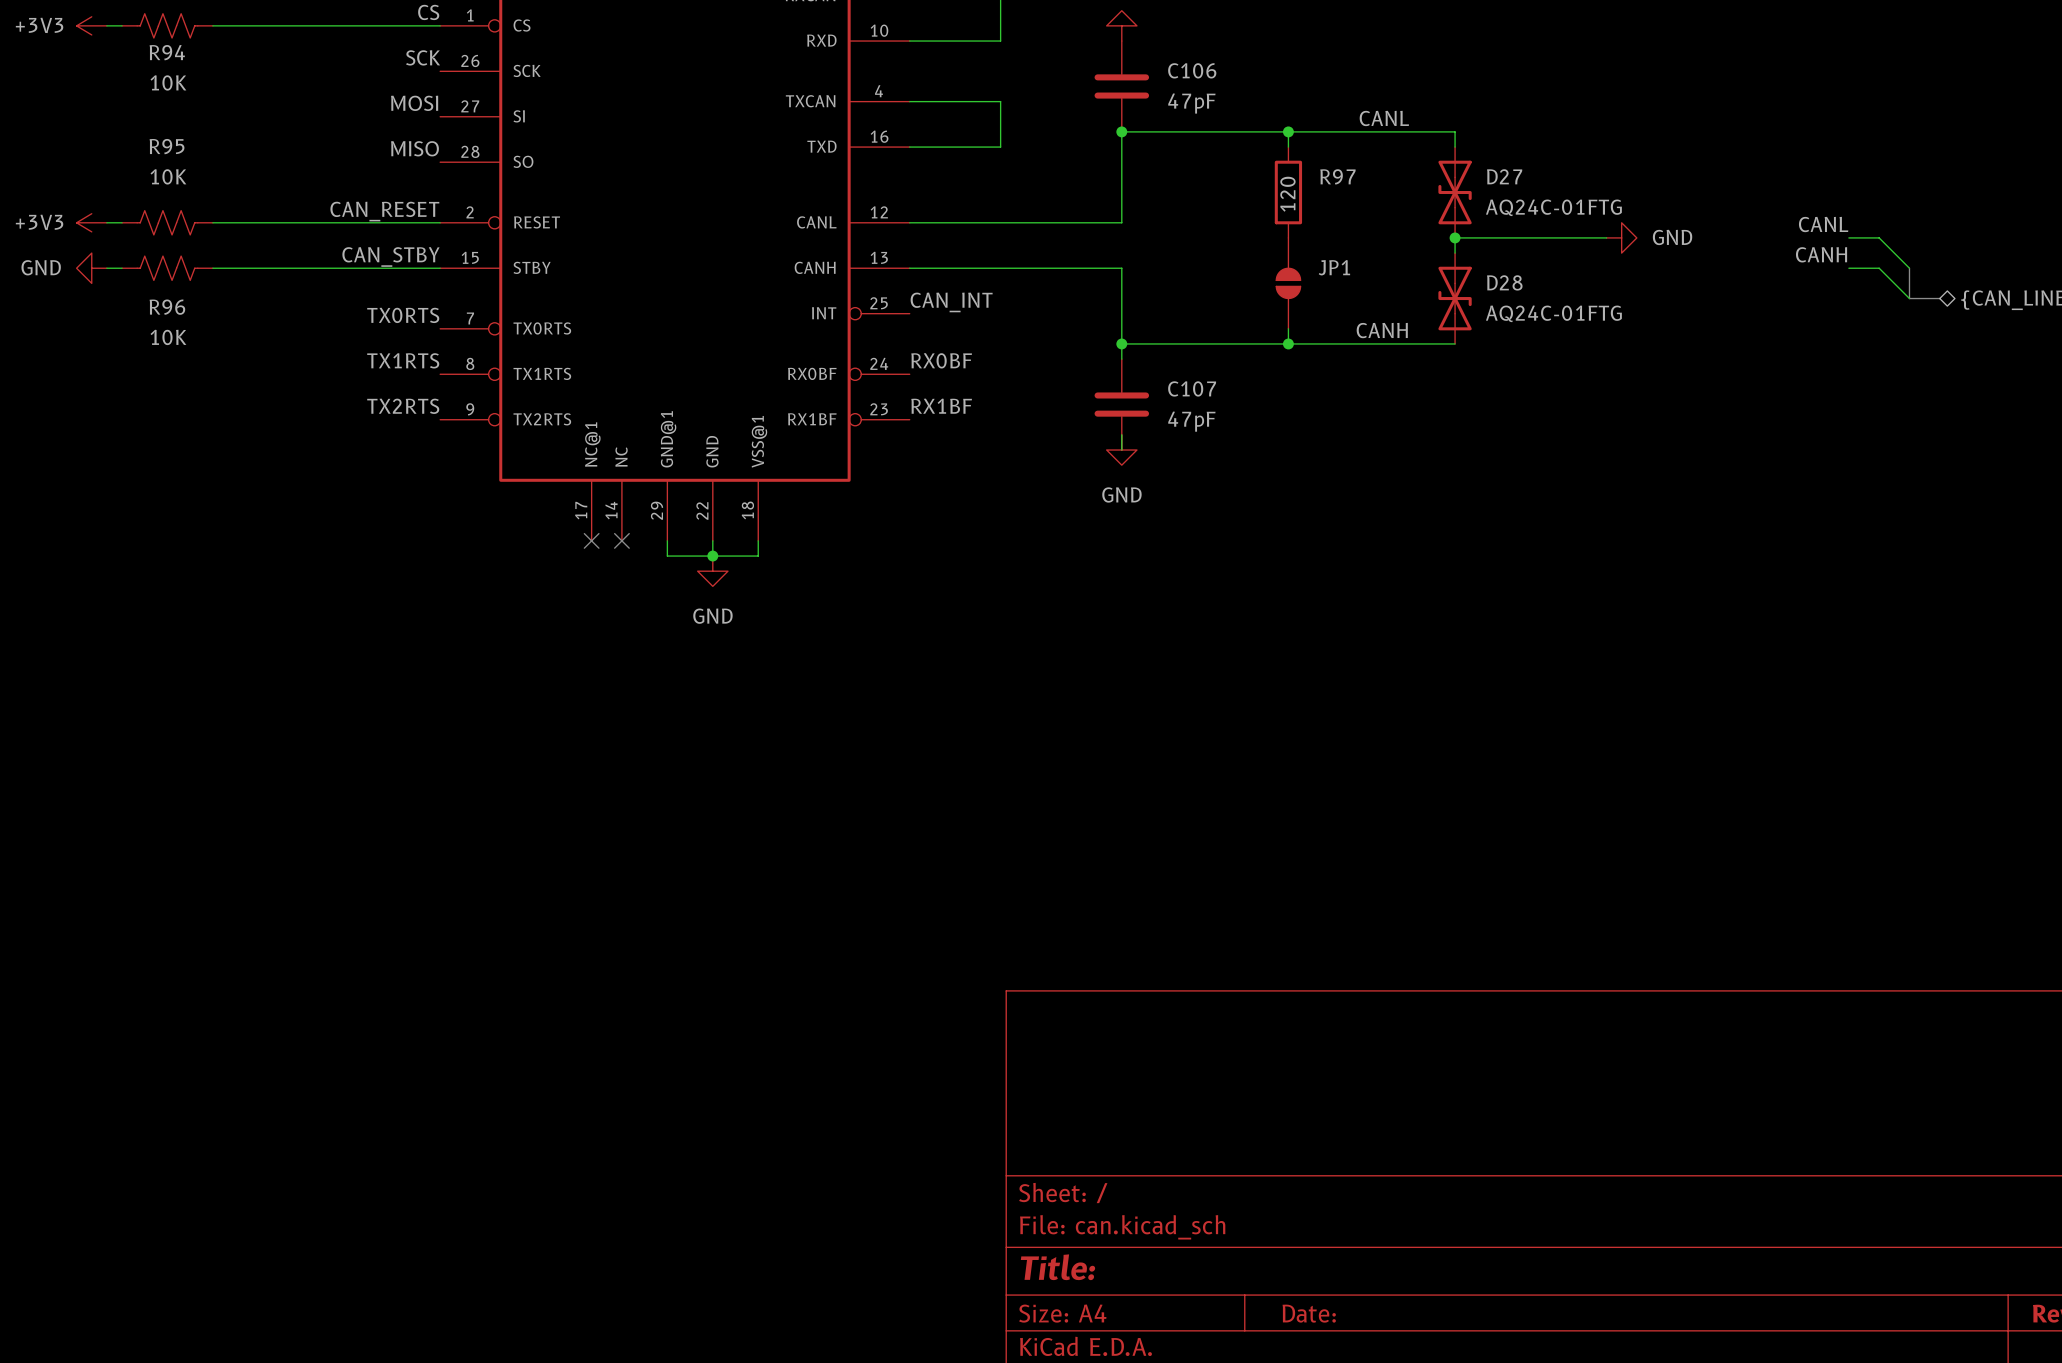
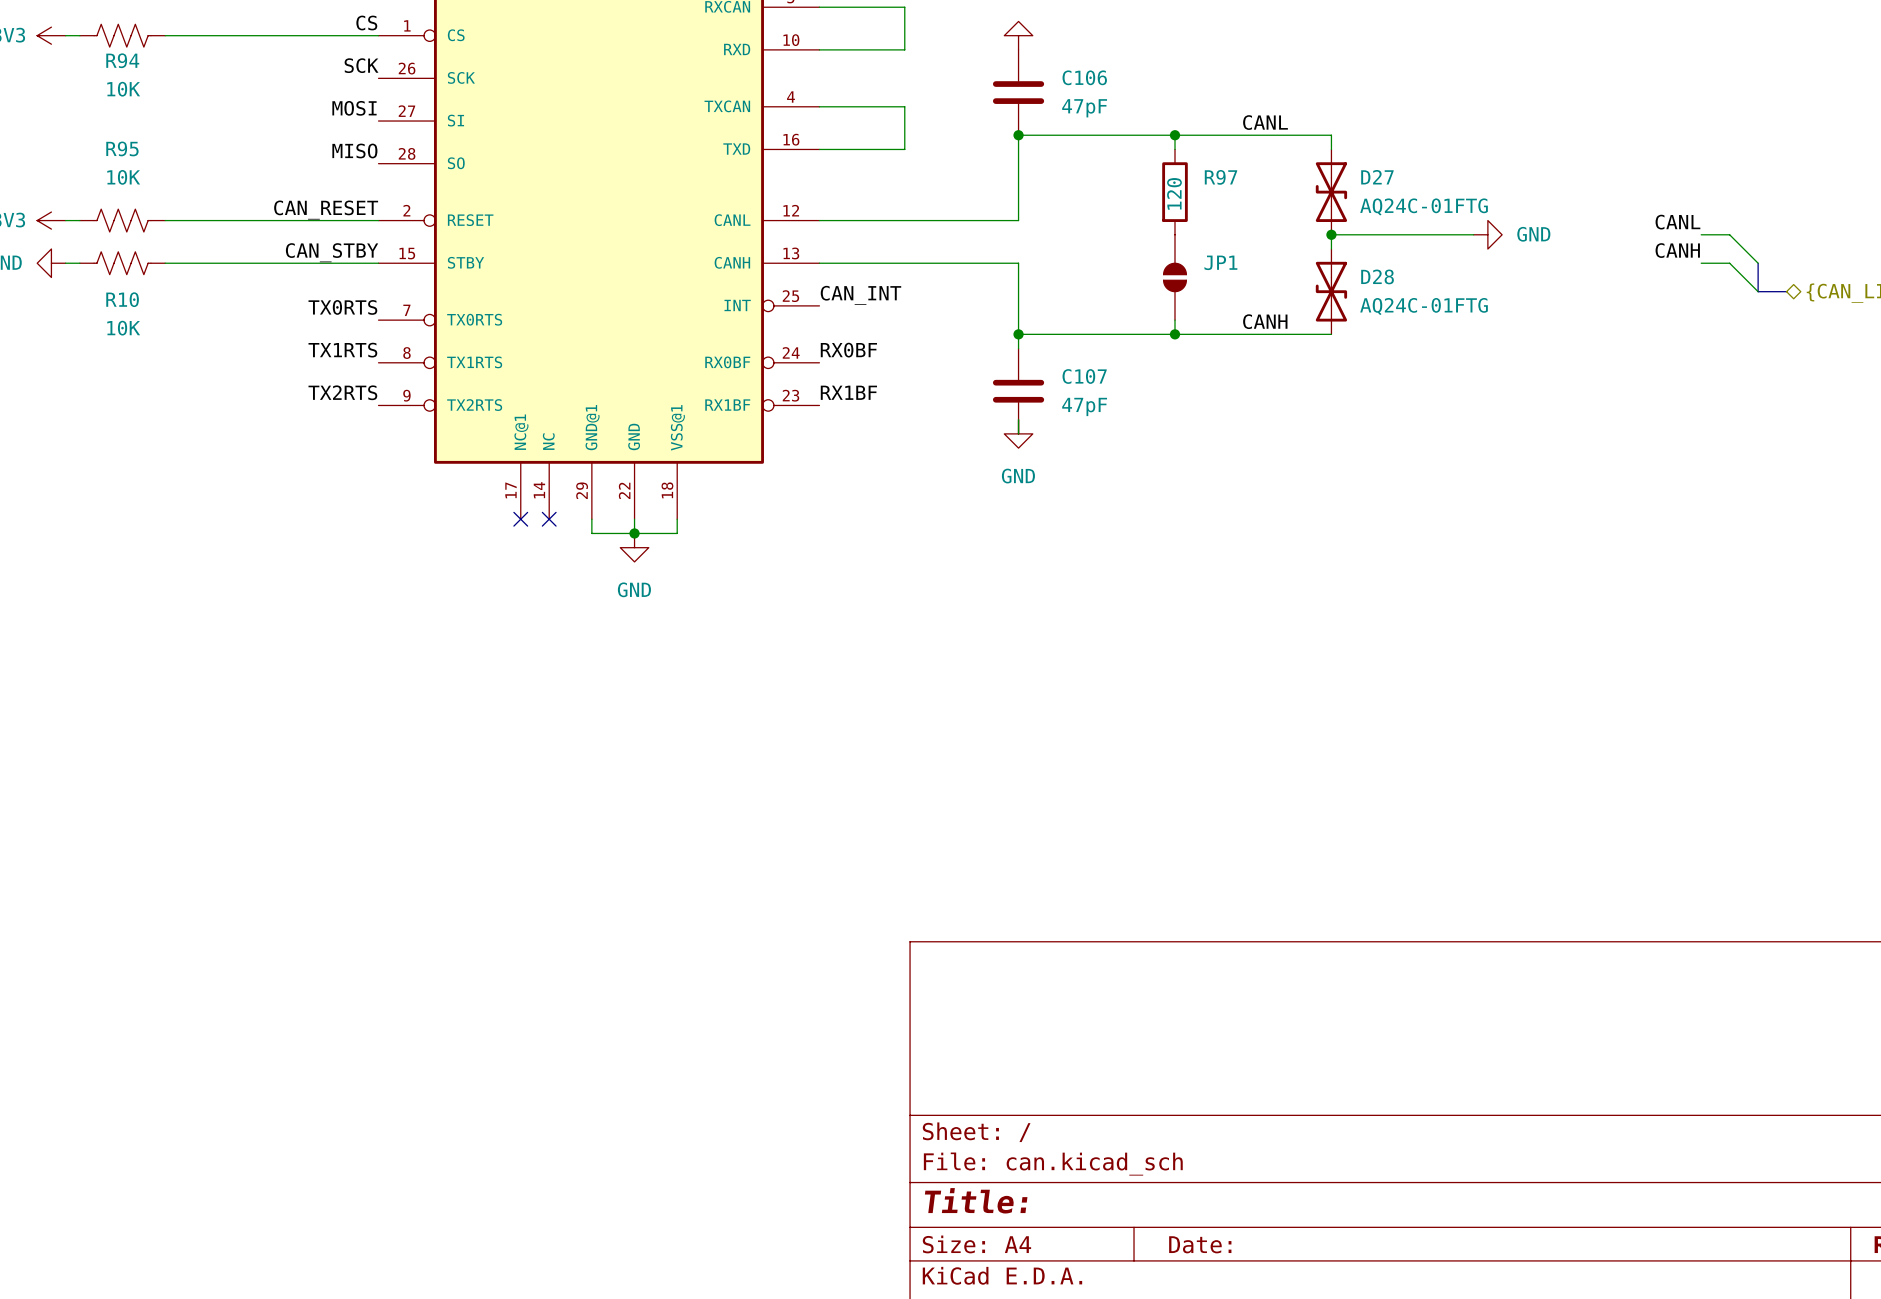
R96 name: R96 (167, 307) -> R10 (122, 299)

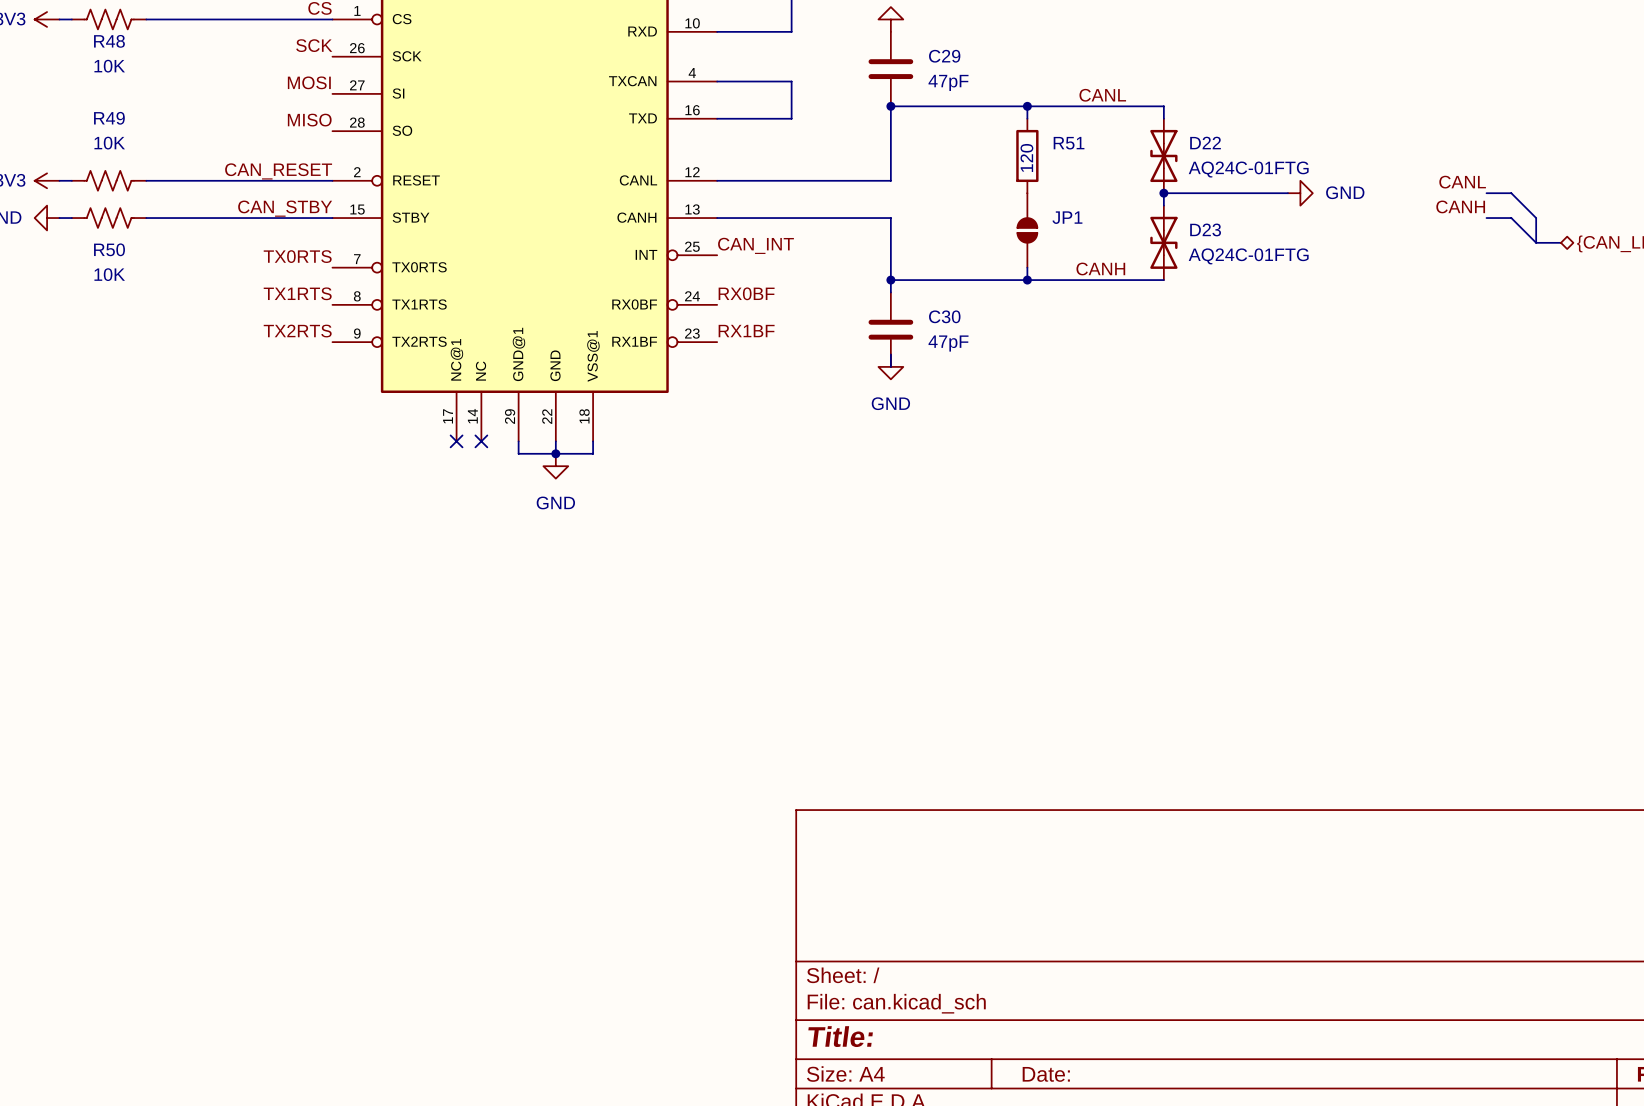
R94 name: R94 (122, 60) -> R48 (109, 41)
C106 name: C106 (1084, 77) -> C29 (944, 56)
R95 name: R95 (122, 148) -> R49 (109, 118)
R97 name: R97 (1221, 177) -> R51 (1069, 143)
D27 name: D27 (1377, 177) -> D22 (1205, 143)
D28 name: D28 (1377, 276) -> D23 (1205, 229)
R10 name: R10 (122, 299) -> R50 (109, 249)
C107 name: C107 (1084, 376) -> C30 (944, 316)

